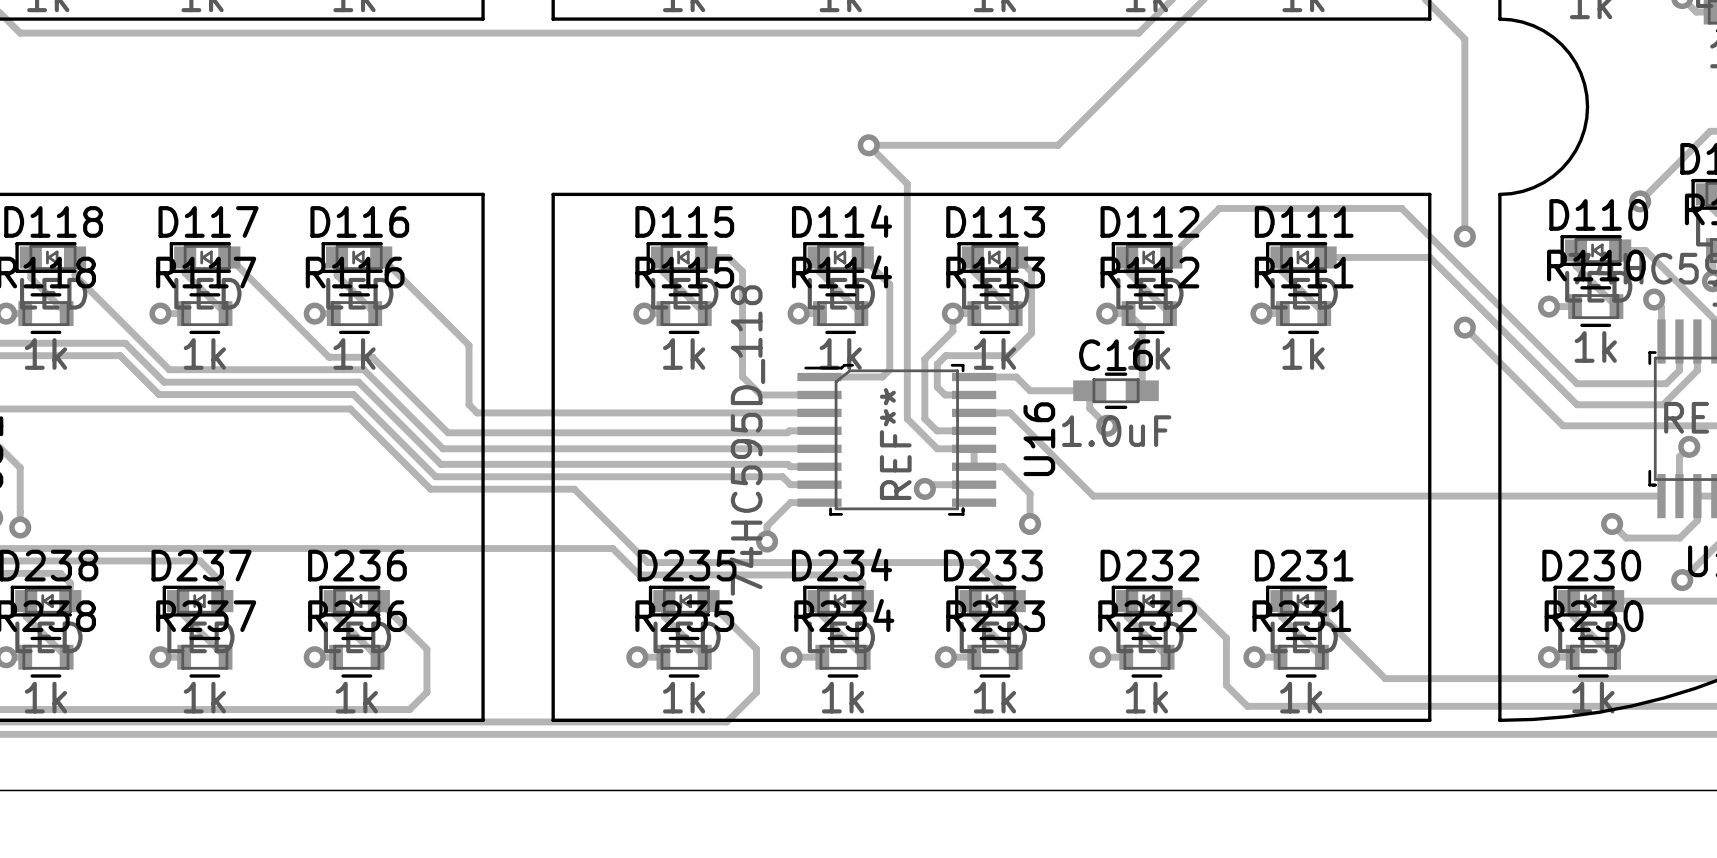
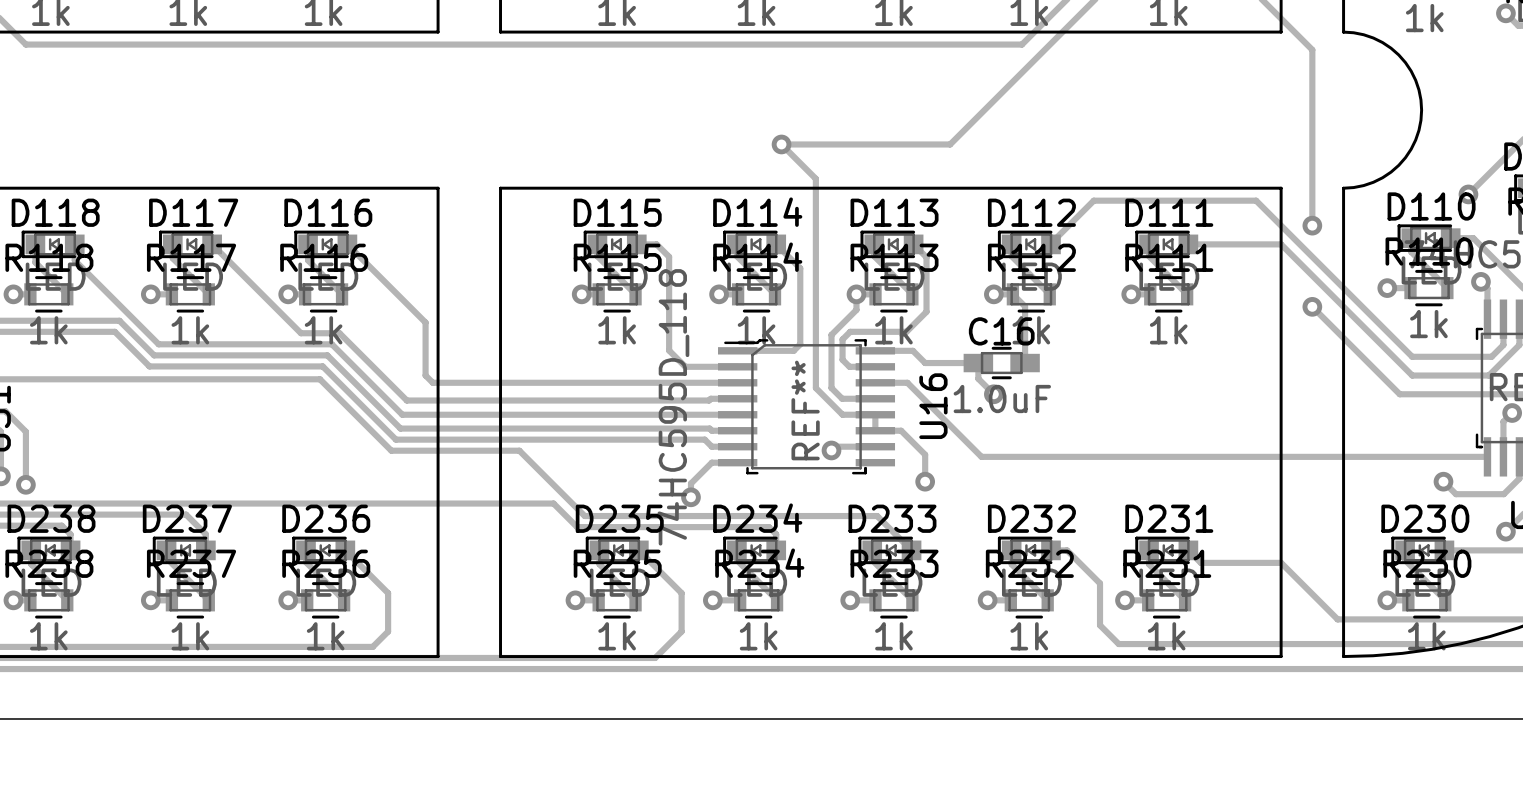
track: (1325, 601) (1325, 619) (1385, 678) (1493, 678) -> (1188, 550) (1200, 562) (1281, 562) (1337, 619)

